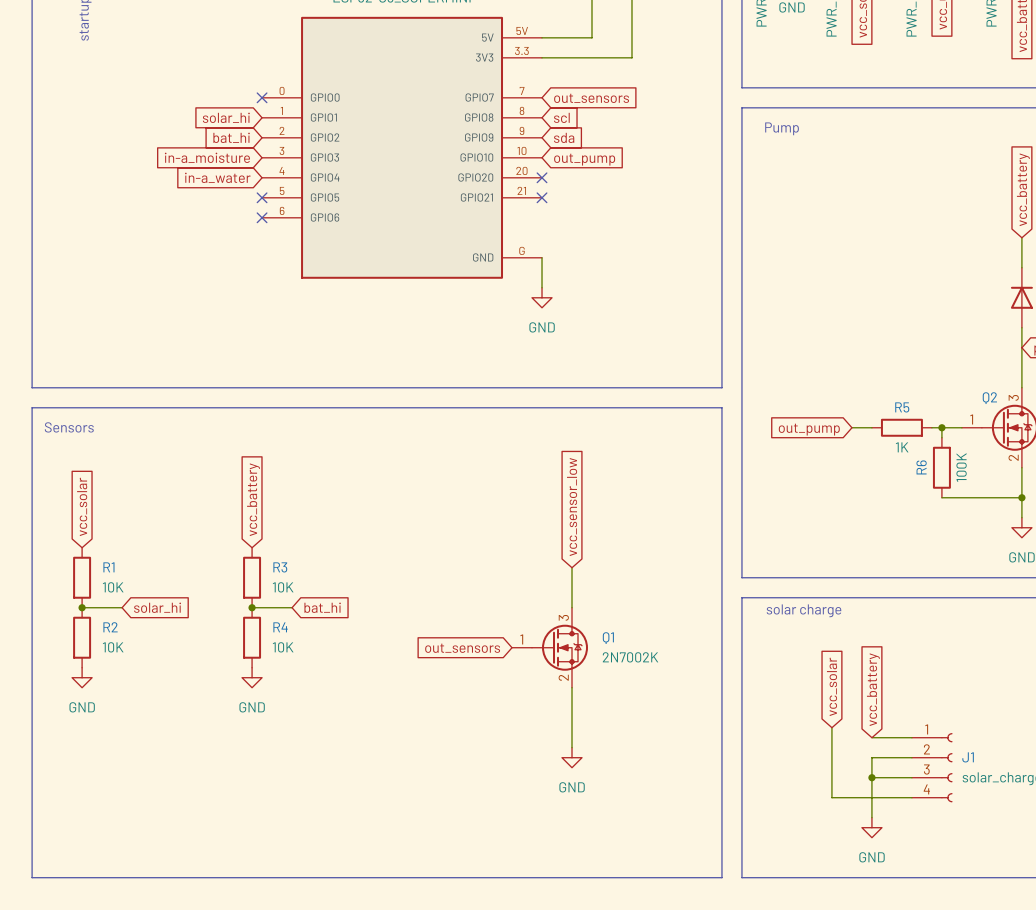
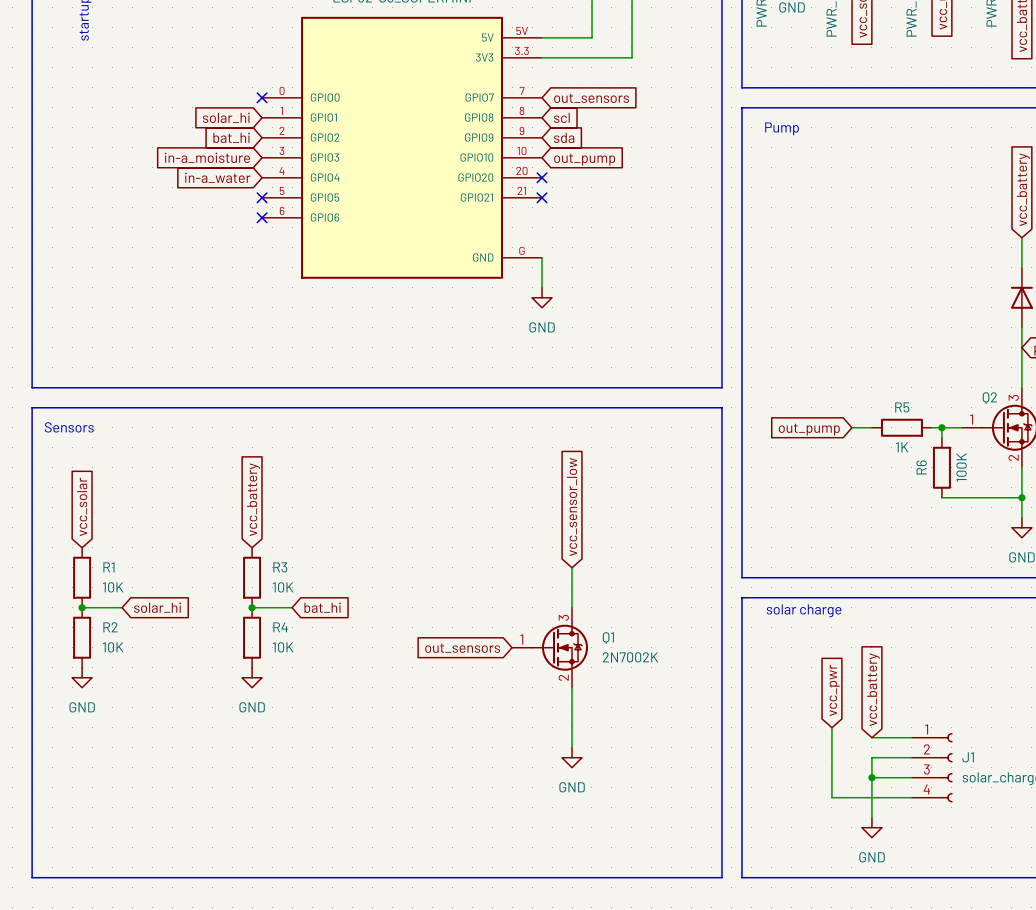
global label: vcc_solar (832, 686) -> vcc_pwr (834, 690)

